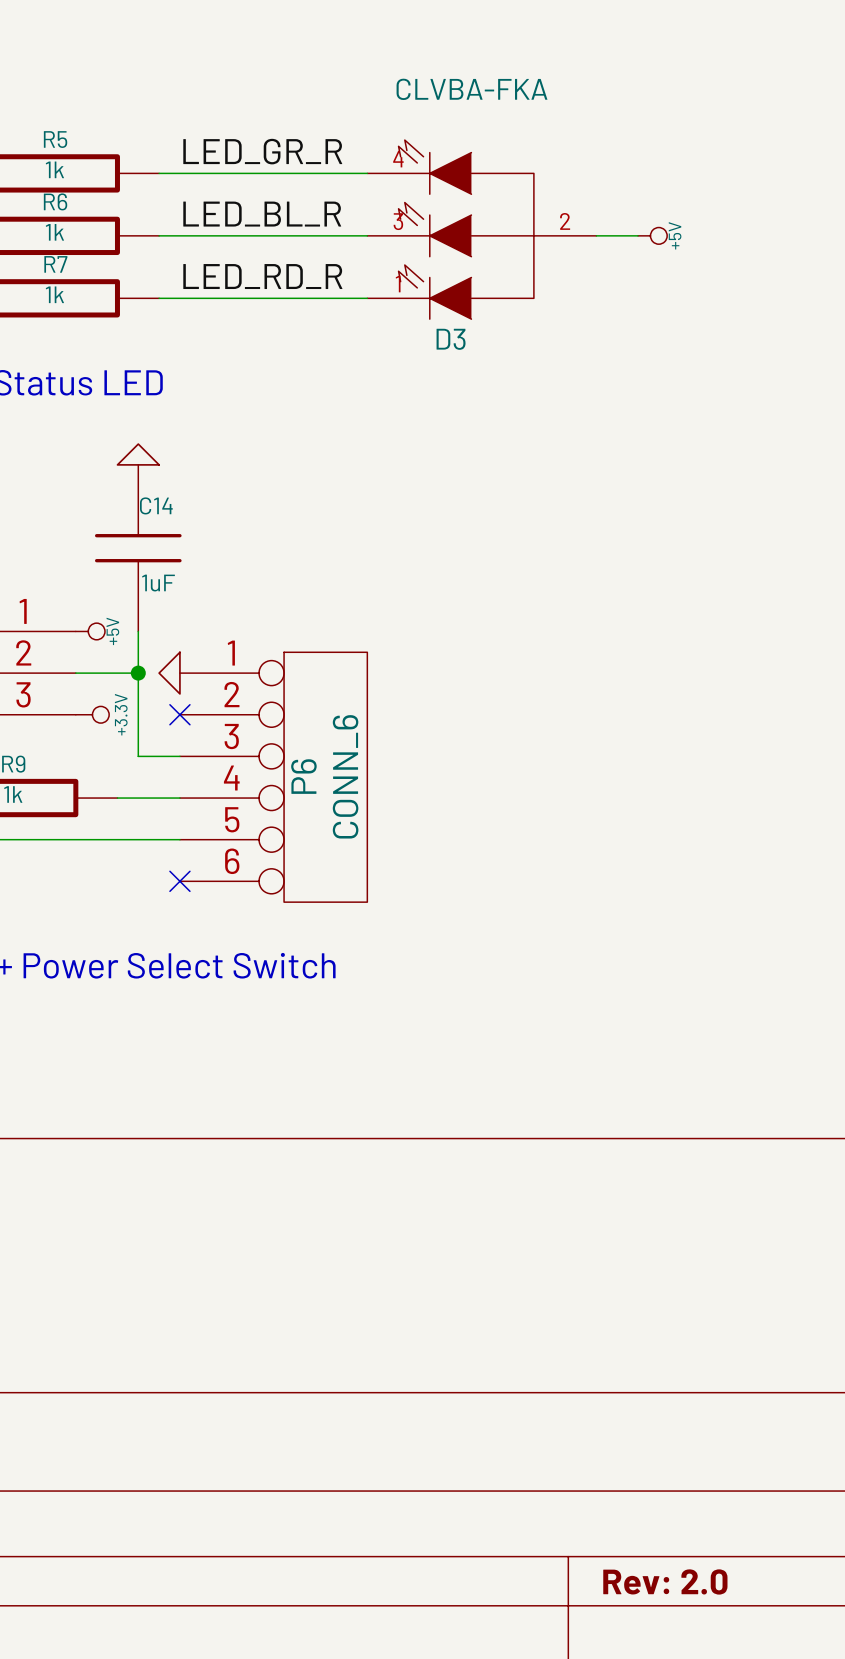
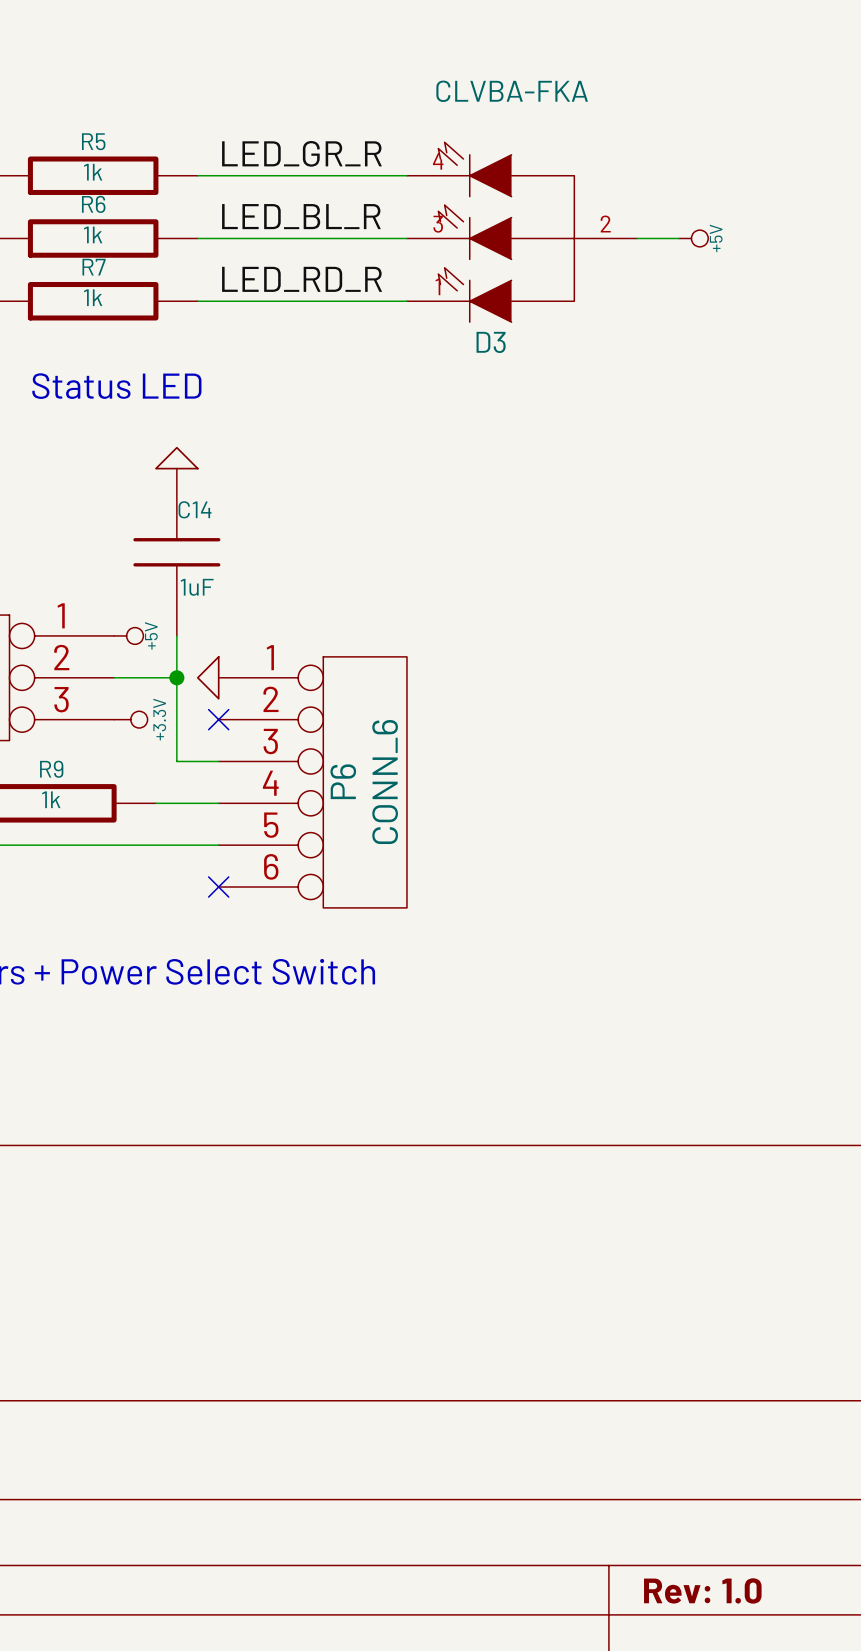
title block: Rev: 2.0 (665, 1581) -> Rev: 1.0 (702, 1590)

